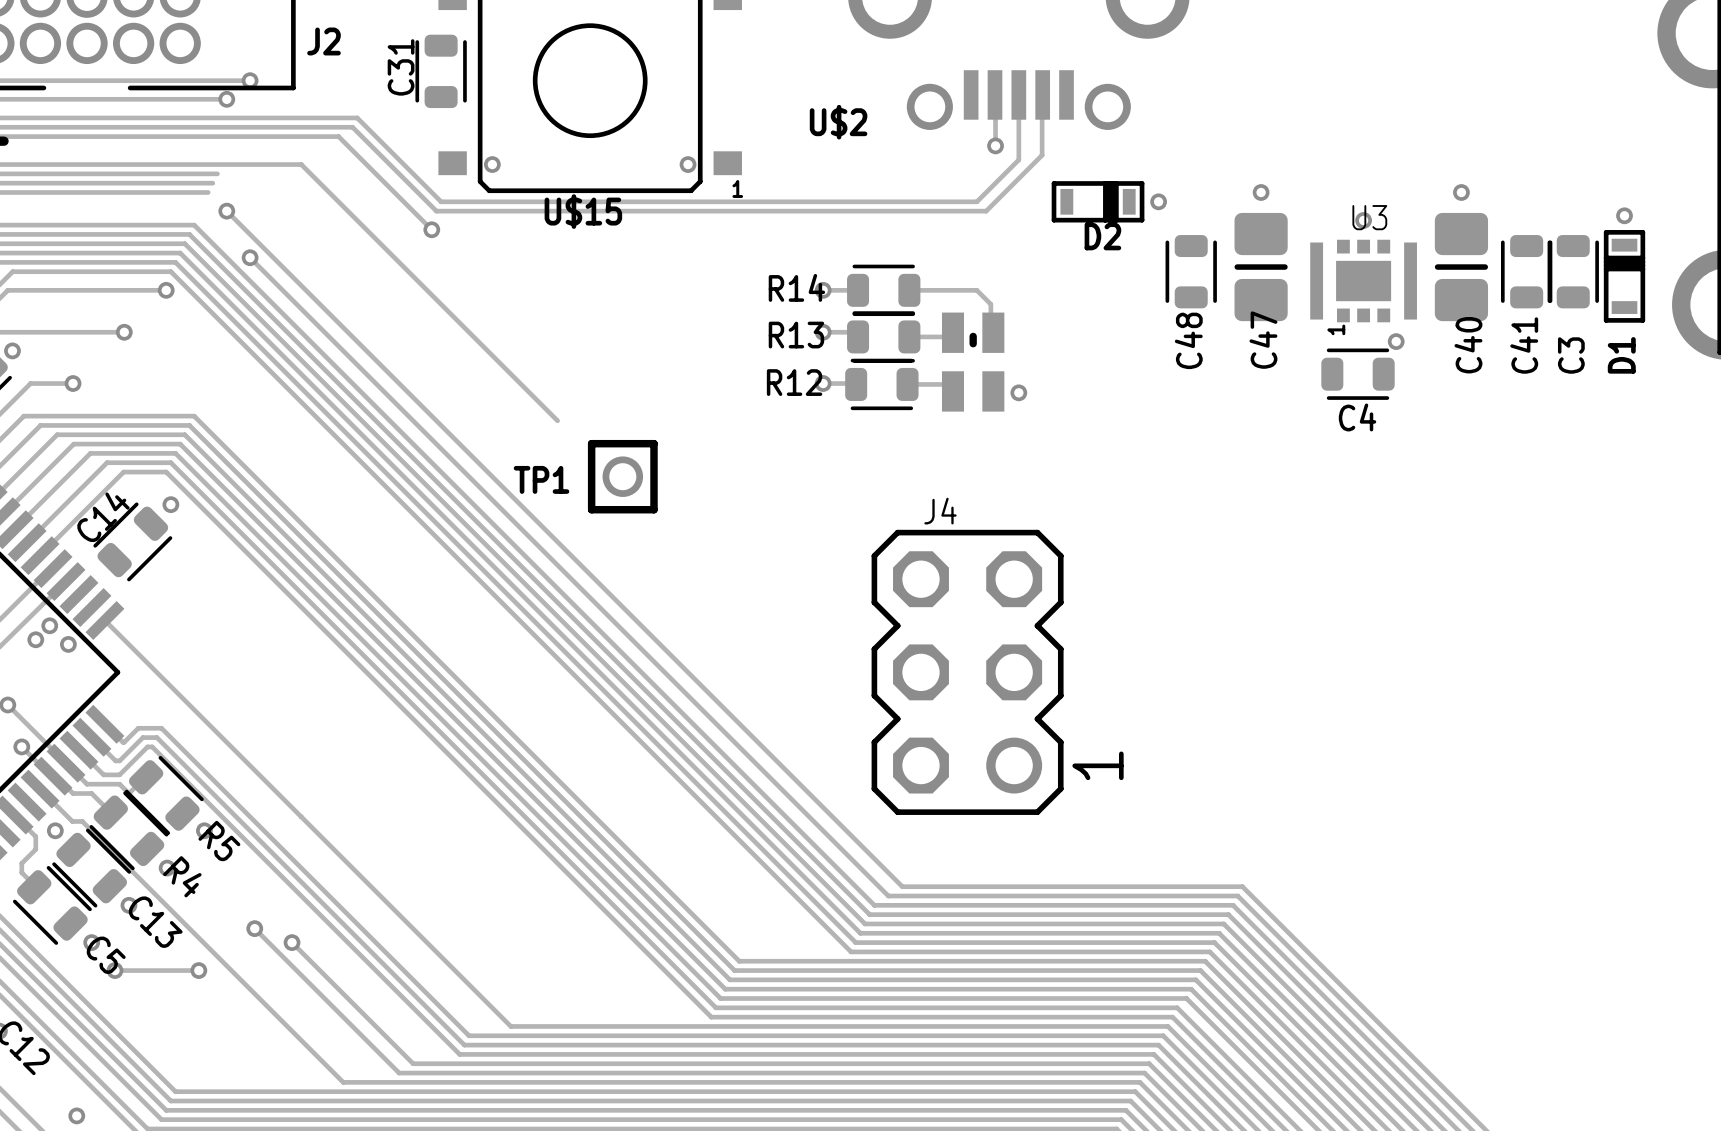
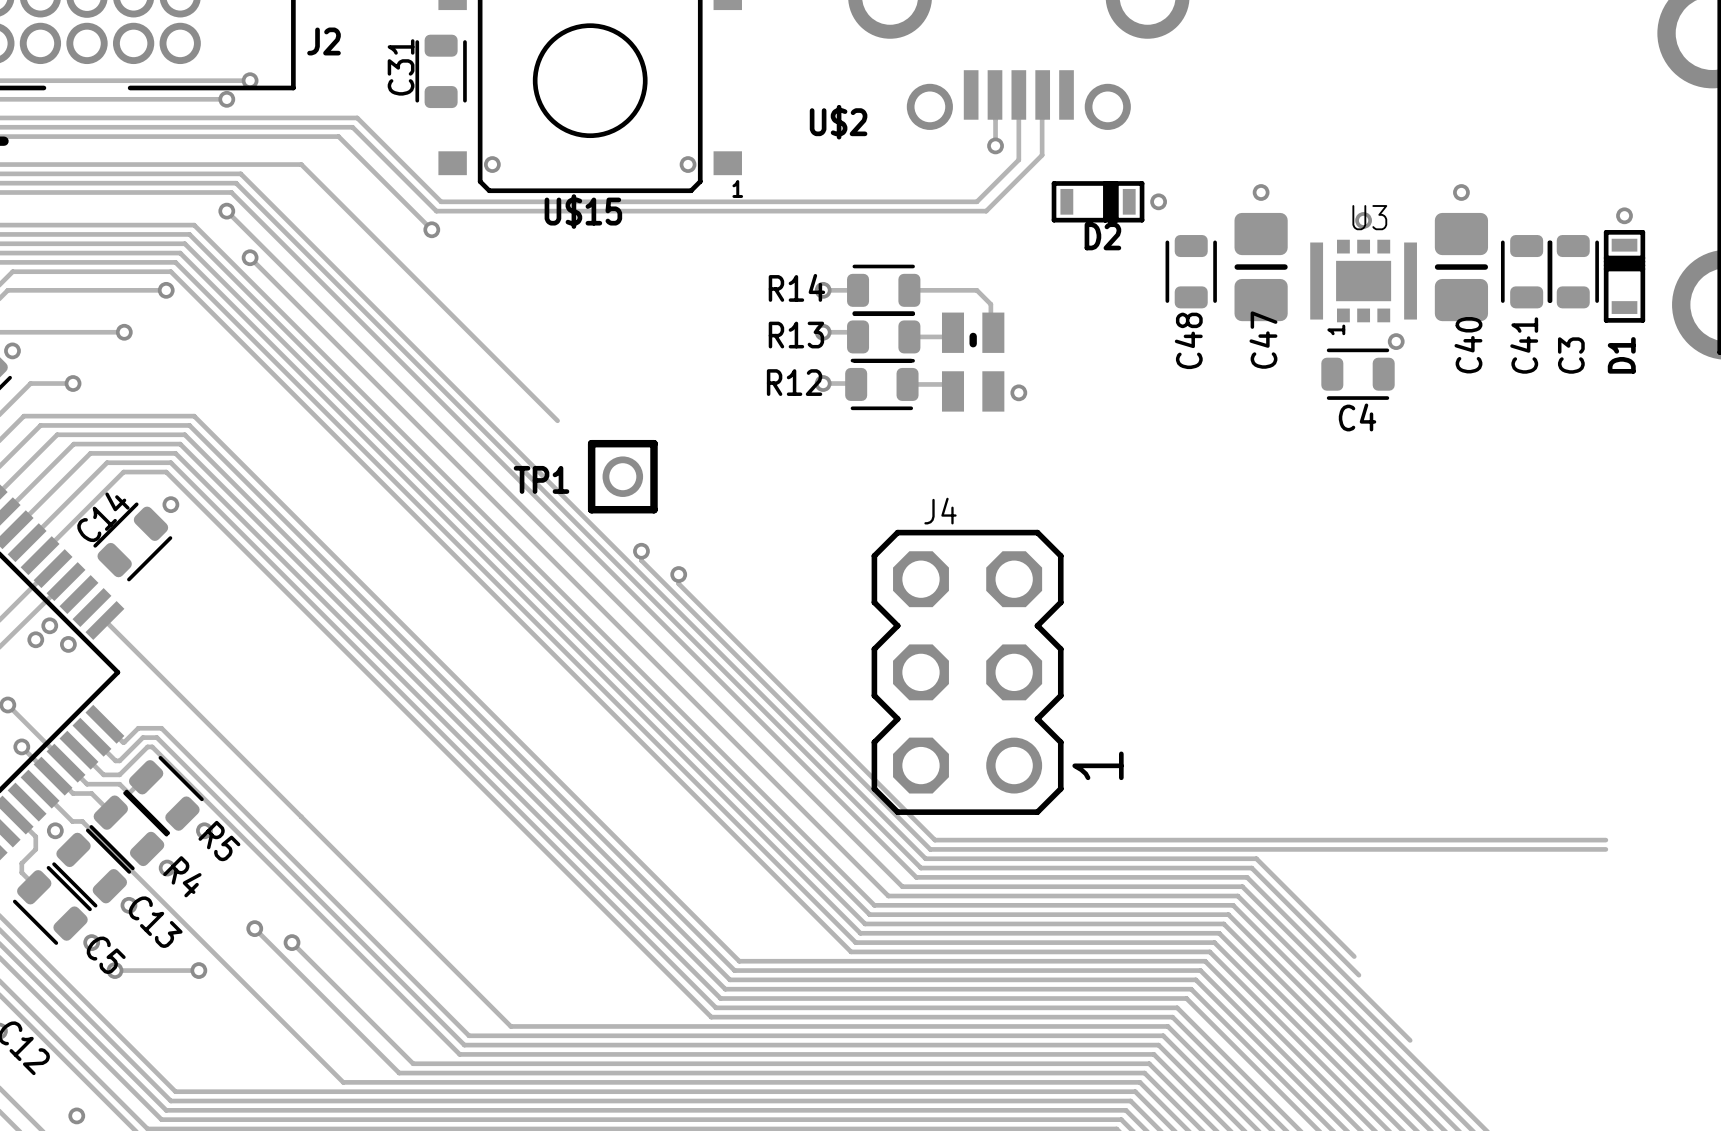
track: none -> (217, 173) (240, 173) (925, 858) (1256, 858) (1354, 956)
track: none -> (212, 183) (236, 183) (920, 868) (1251, 868) (1358, 975)
track: none -> (208, 192) (231, 192) (916, 877) (1247, 877) (1410, 1040)
track: none -> (641, 551) (641, 560) (930, 849) (1605, 849)
via: none -> (641, 551)
track: none -> (678, 574) (678, 583) (934, 840) (1605, 840)
via: none -> (678, 574)

